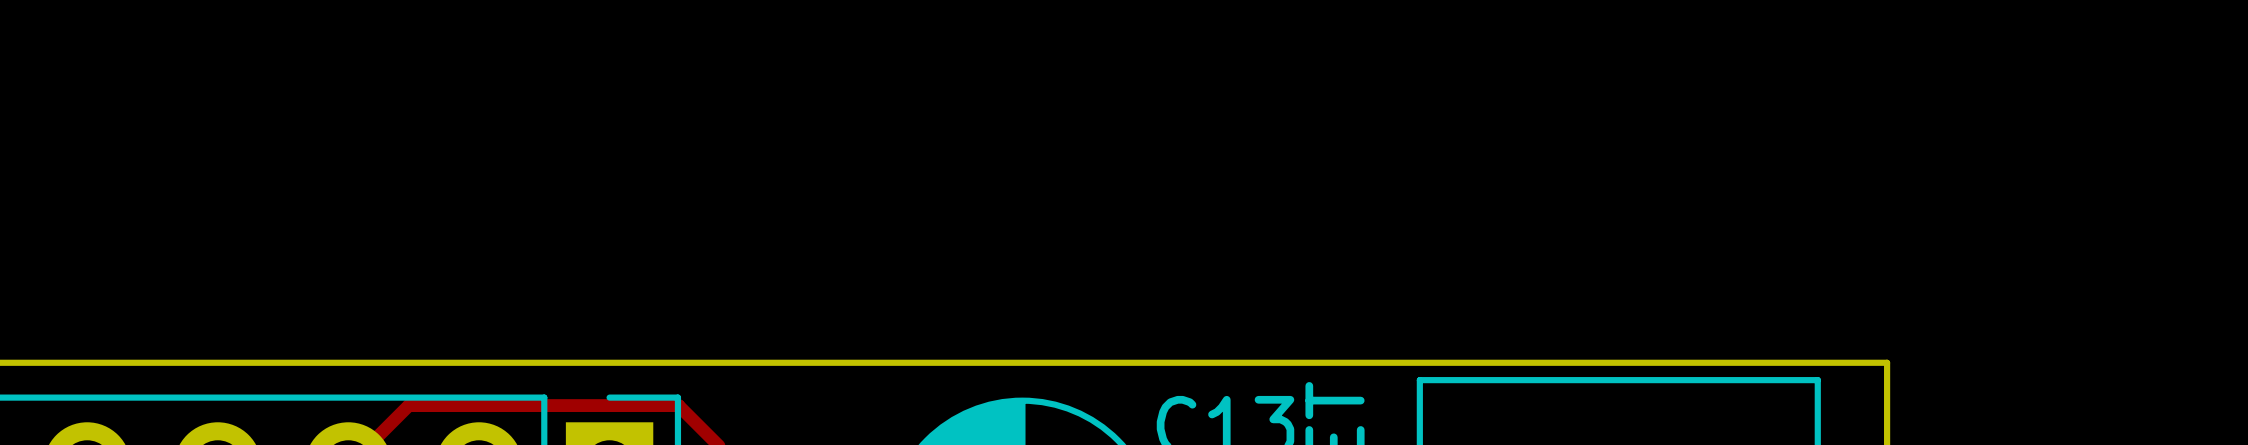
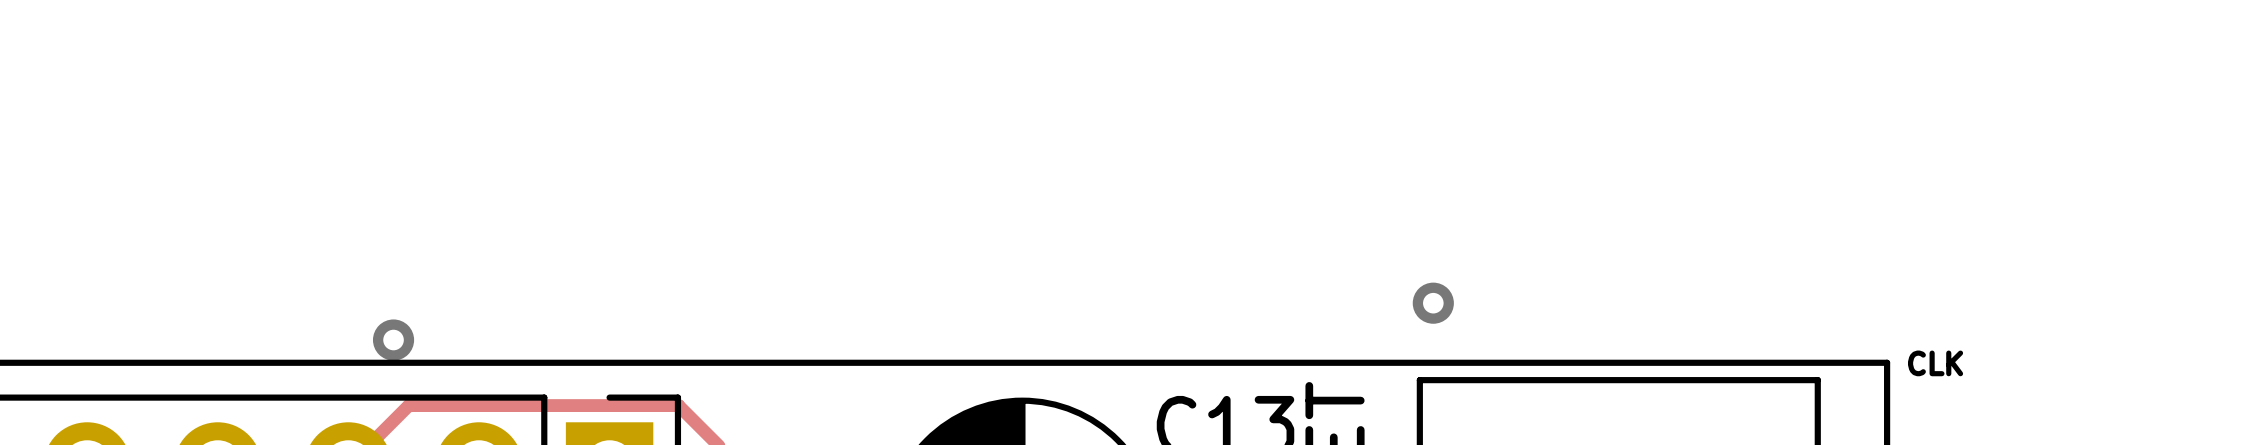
via: none -> (1433, 303)
via: none -> (393, 340)
text: none -> CLK (1935, 363)

